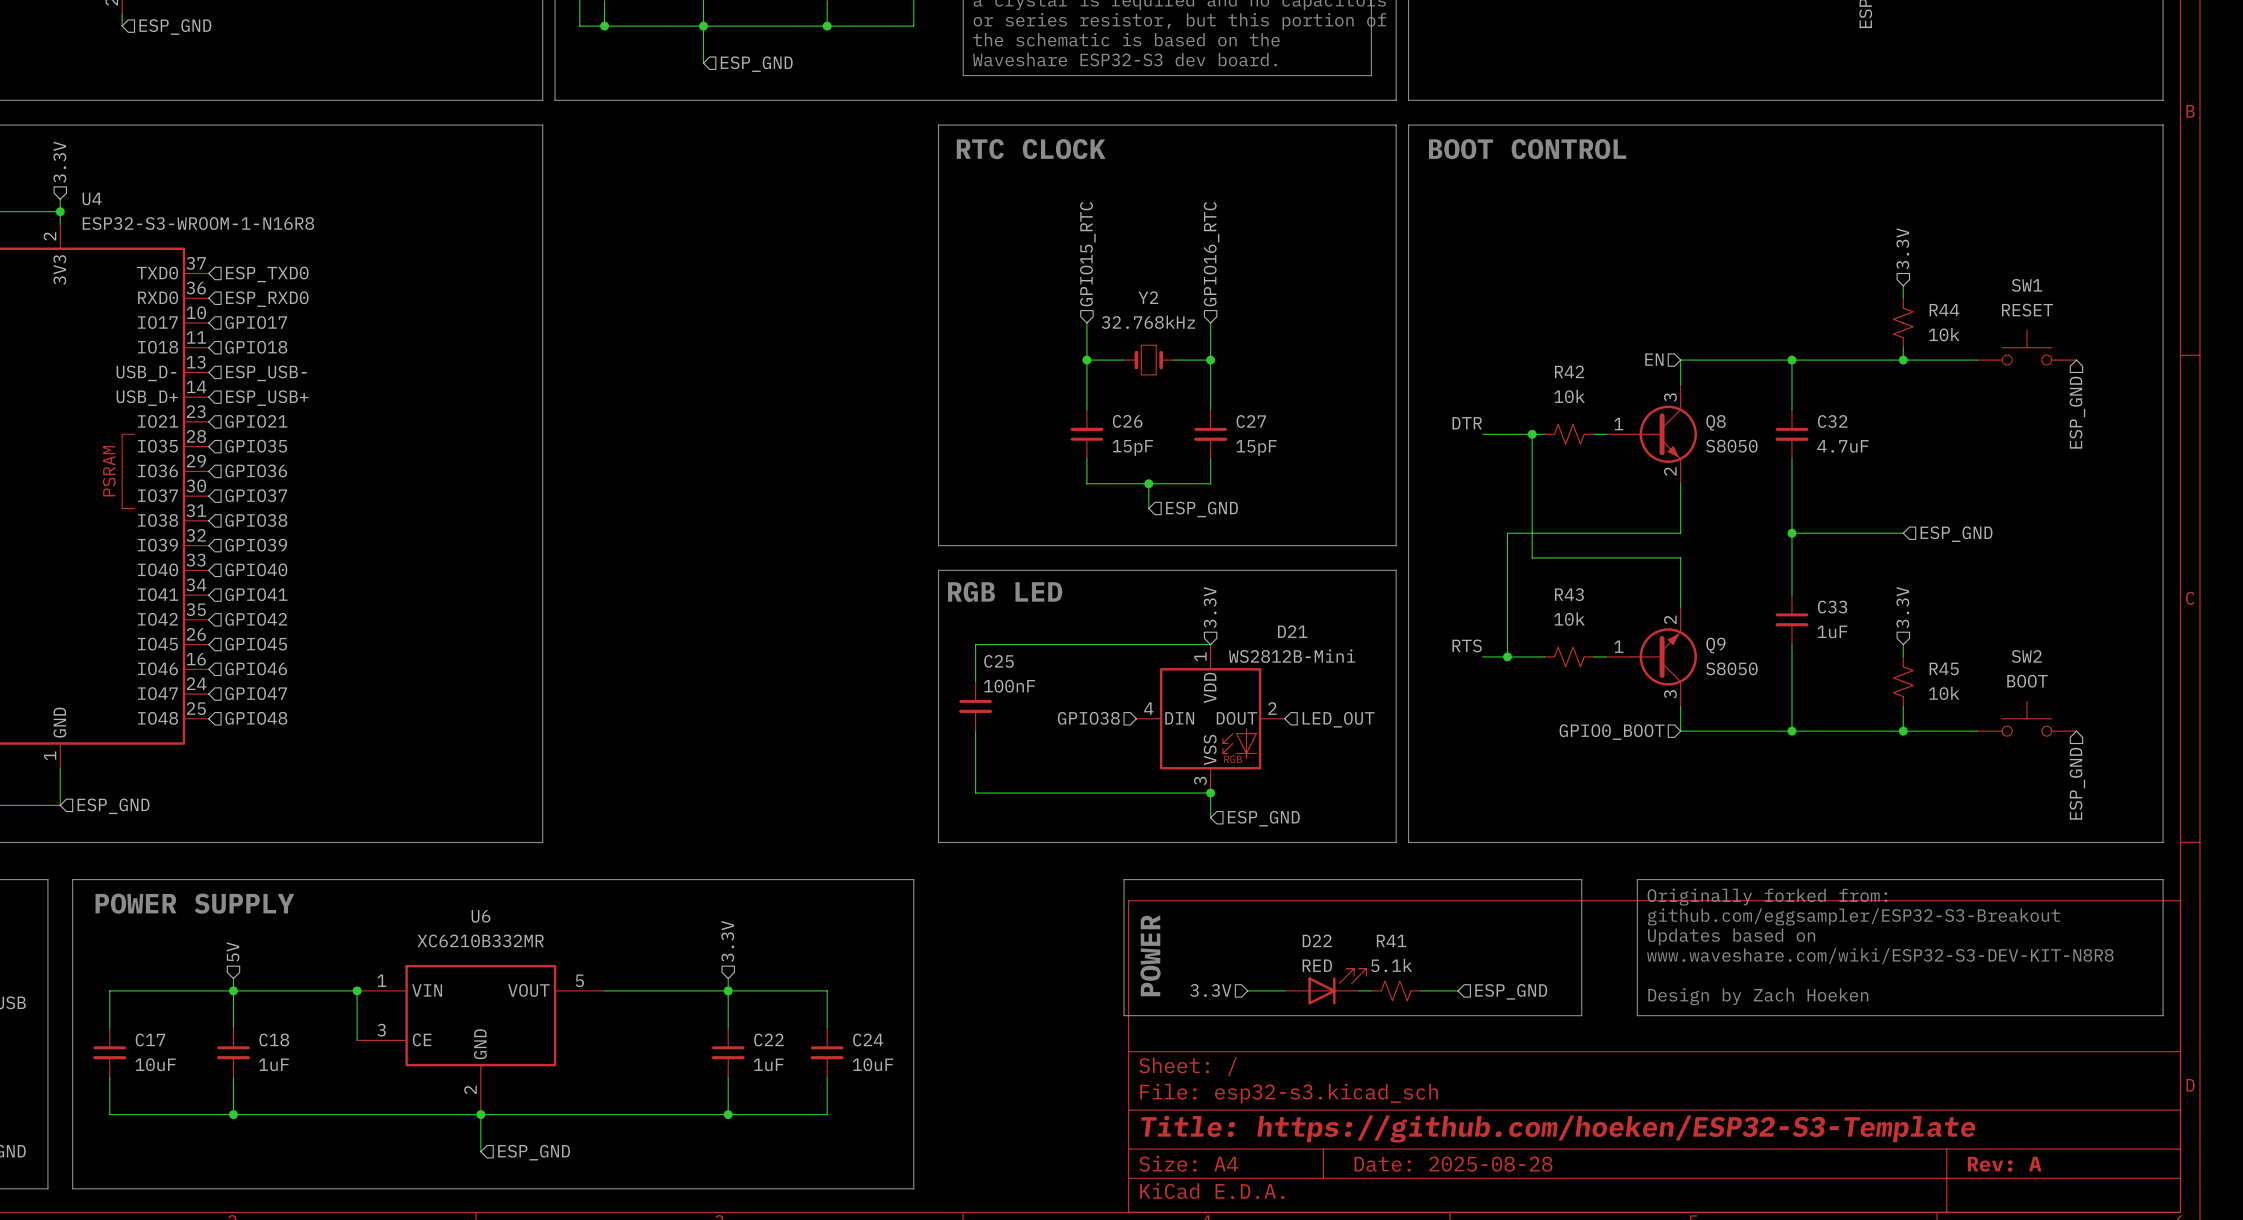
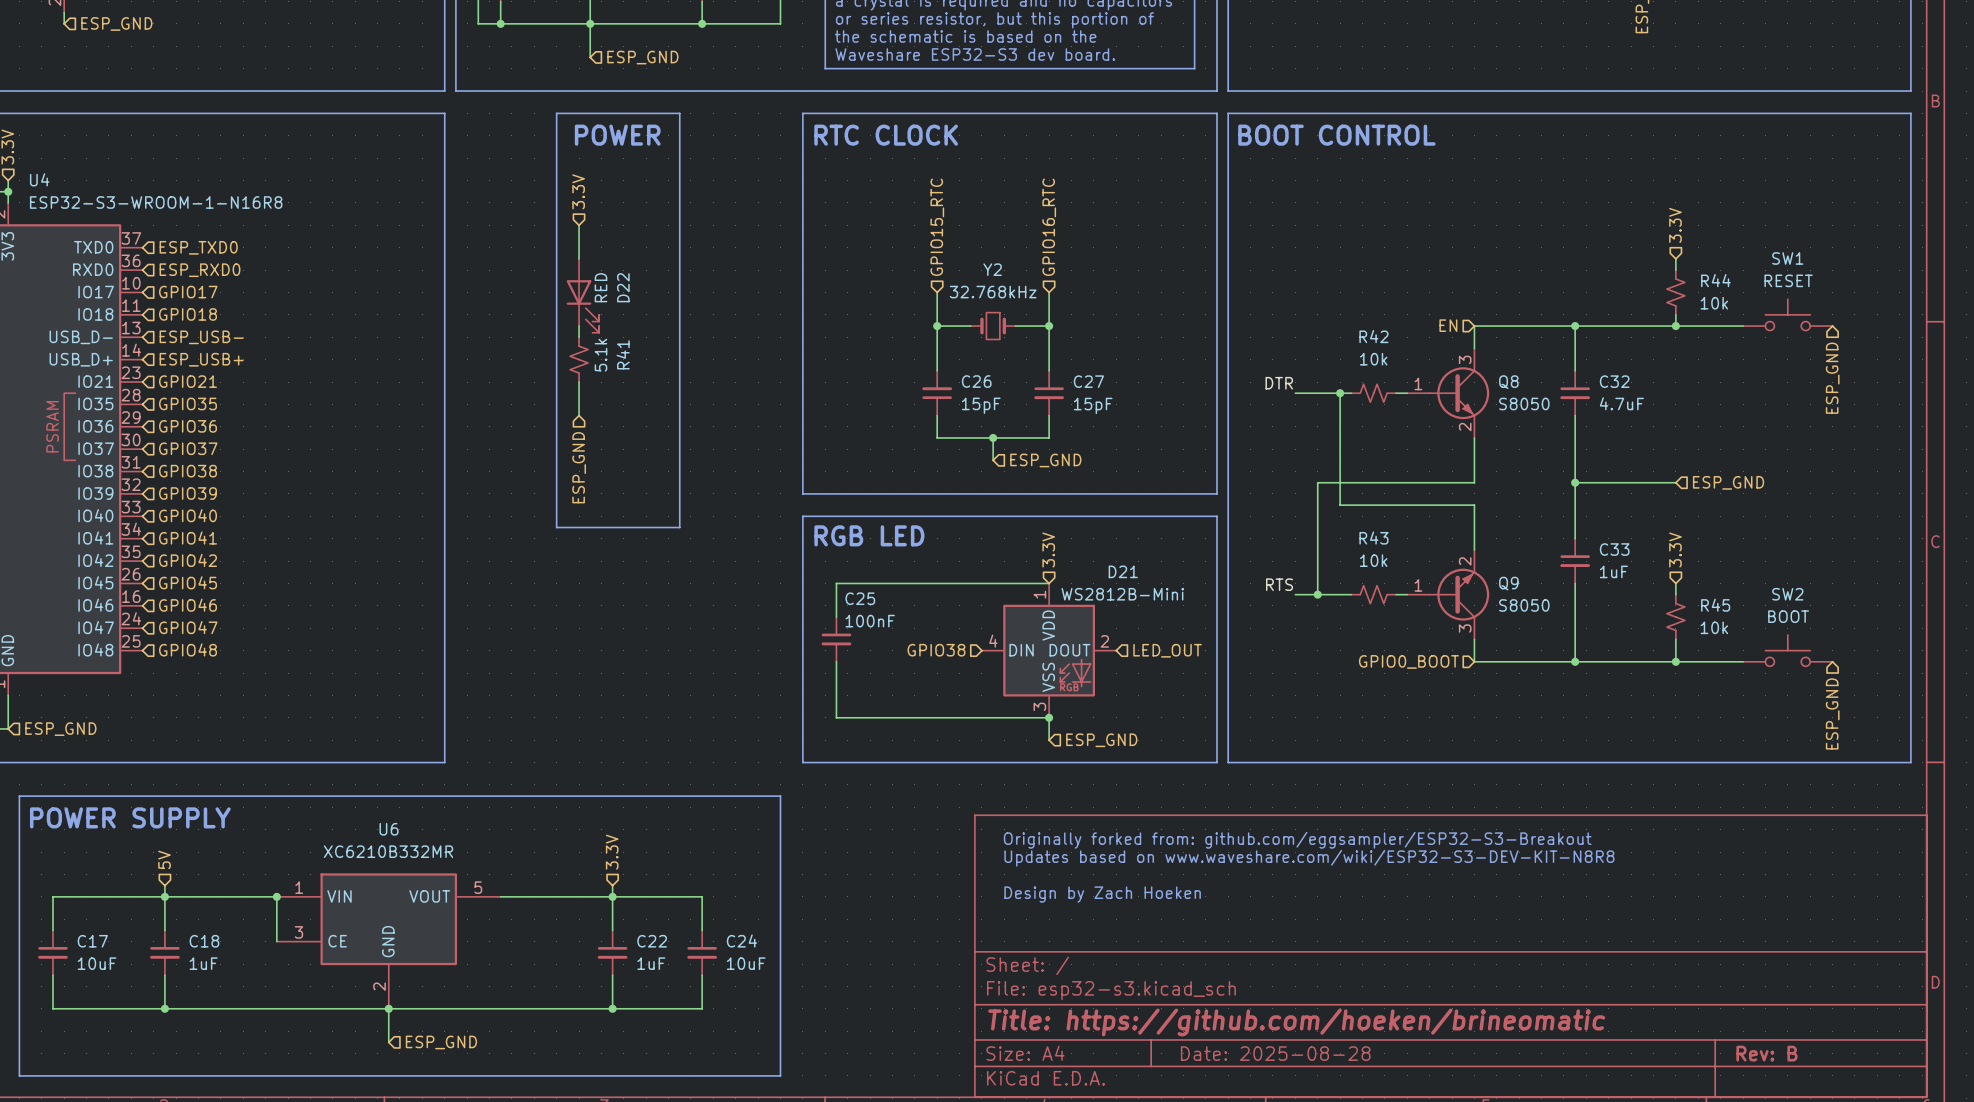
line: none -> (556, 113) (679, 113) (679, 527) (556, 527) (556, 113)
text: none -> POWER (617, 135)
hierarchical label: none -> 3.3V (578, 191)
wire: none -> (579, 225) (579, 258)
wire: none -> (579, 326) (579, 337)
wire: none -> (579, 382) (579, 415)
hierarchical label: none -> ESP_GND (579, 467)
line: (1124, 879) (1581, 879) (1581, 1015) (1124, 1015) (1124, 879) -> none
line: (1637, 879) (2163, 879) (2163, 1015) (1637, 1015) (1637, 879) -> none
text: Originally forked from: (1767, 897) -> none
text: github.com/eggsampler/ESP32-S3-Breakout (1853, 916) -> none
text: none -> Originally forked from: github.com/eggsampler/ESP32-S3-Breakout (1297, 840)
text: Updates based on (1731, 936) -> none
text: none -> Updates based on www.waveshare.com/wiki/ESP32-S3-DEV-KIT-N8R8 (1309, 858)
text: POWER (1150, 955) -> none
text: www.waveshare.com/wiki/ESP32-S3-DEV-KIT-N8R8 (1880, 956) -> none
D22 position: (1325, 986) -> (582, 295)
D22 rotation: 0° (1337, 986) -> 90° clockwise (582, 306)
text: none -> Design by Zach Hoeken (1102, 894)
hierarchical label: 3.3V (1210, 990) -> none
wire: (1247, 990) (1284, 990) -> none
wire: (1359, 990) (1371, 990) -> none
R41 rotation: 0° (1396, 990) -> 90° clockwise (579, 359)
R41 position: (1396, 990) -> (579, 359)
wire: (1420, 990) (1458, 990) -> none
hierarchical label: ESP_GND (1511, 991) -> none
text: Design by Zach Hoeken (1758, 996) -> none
title block: Title: https://github.com/hoeken/ESP32-S3-Template (1558, 1129) -> Title: https://github.com/hoeken/brineomatic (1296, 1022)
title block: Rev: A (2004, 1164) -> Rev: B (1766, 1053)

